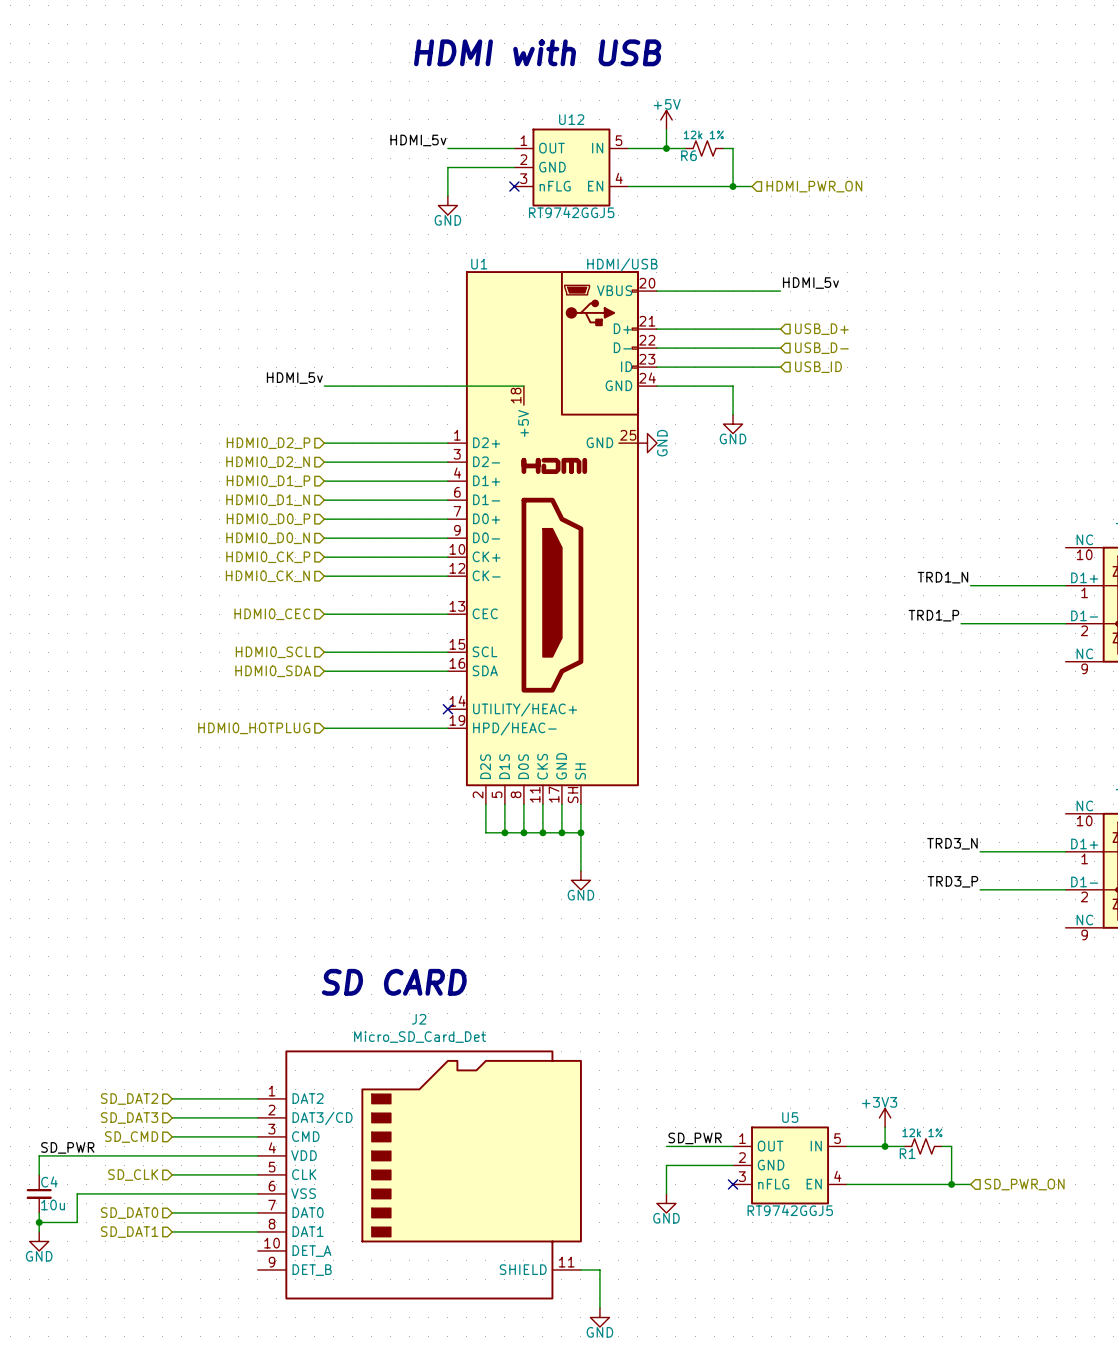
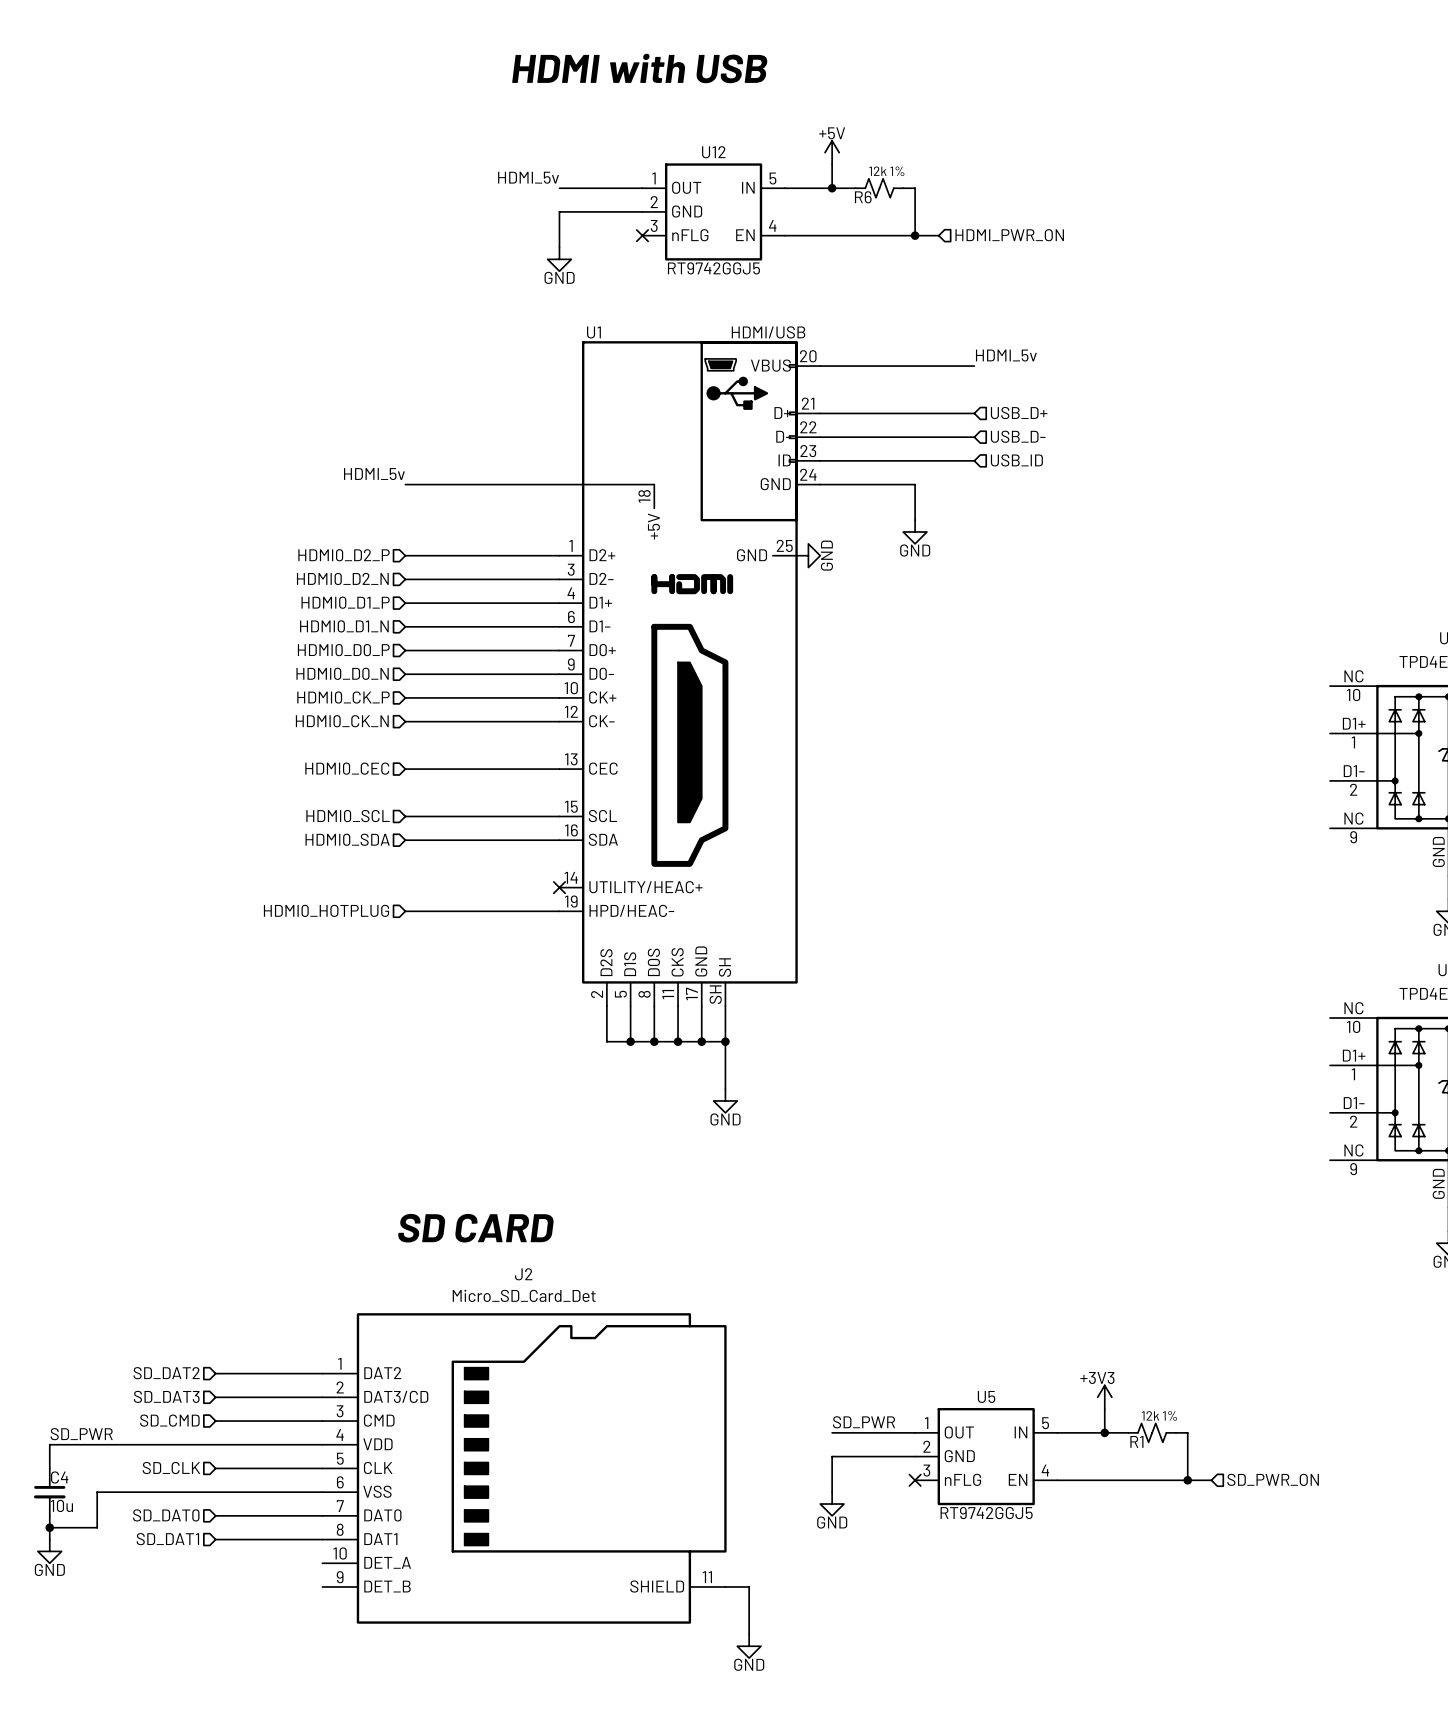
label: TRD1_N (942, 577) -> none
wire: (970, 585) (1065, 585) -> none
label: TRD1_P (933, 615) -> none
wire: (961, 623) (1065, 623) -> none
label: TRD3_N (952, 843) -> none
wire: (980, 851) (1065, 851) -> none
label: TRD3_P (952, 881) -> none
wire: (980, 889) (1065, 889) -> none

